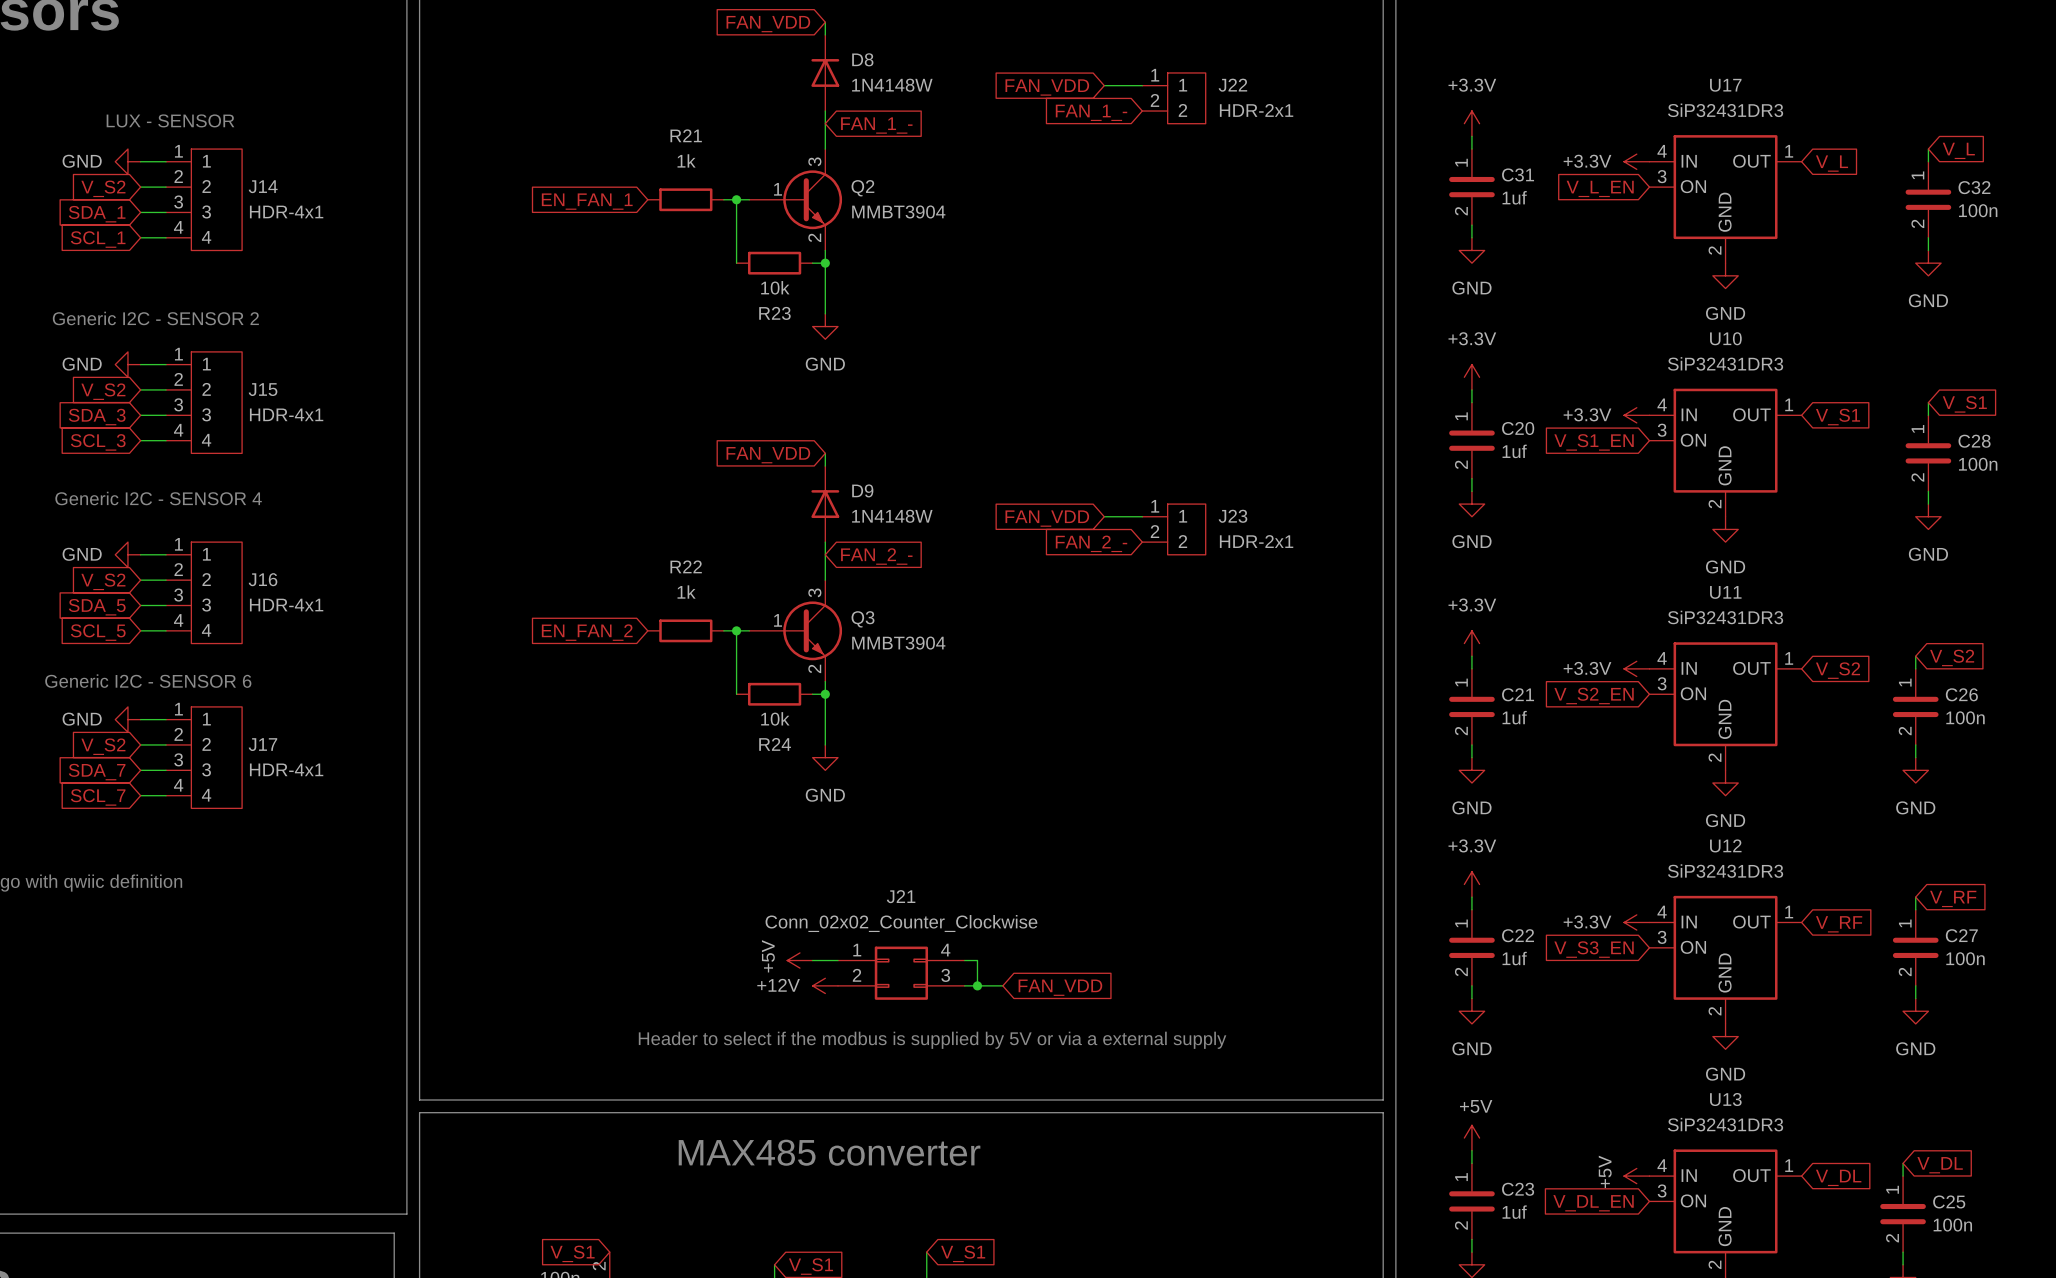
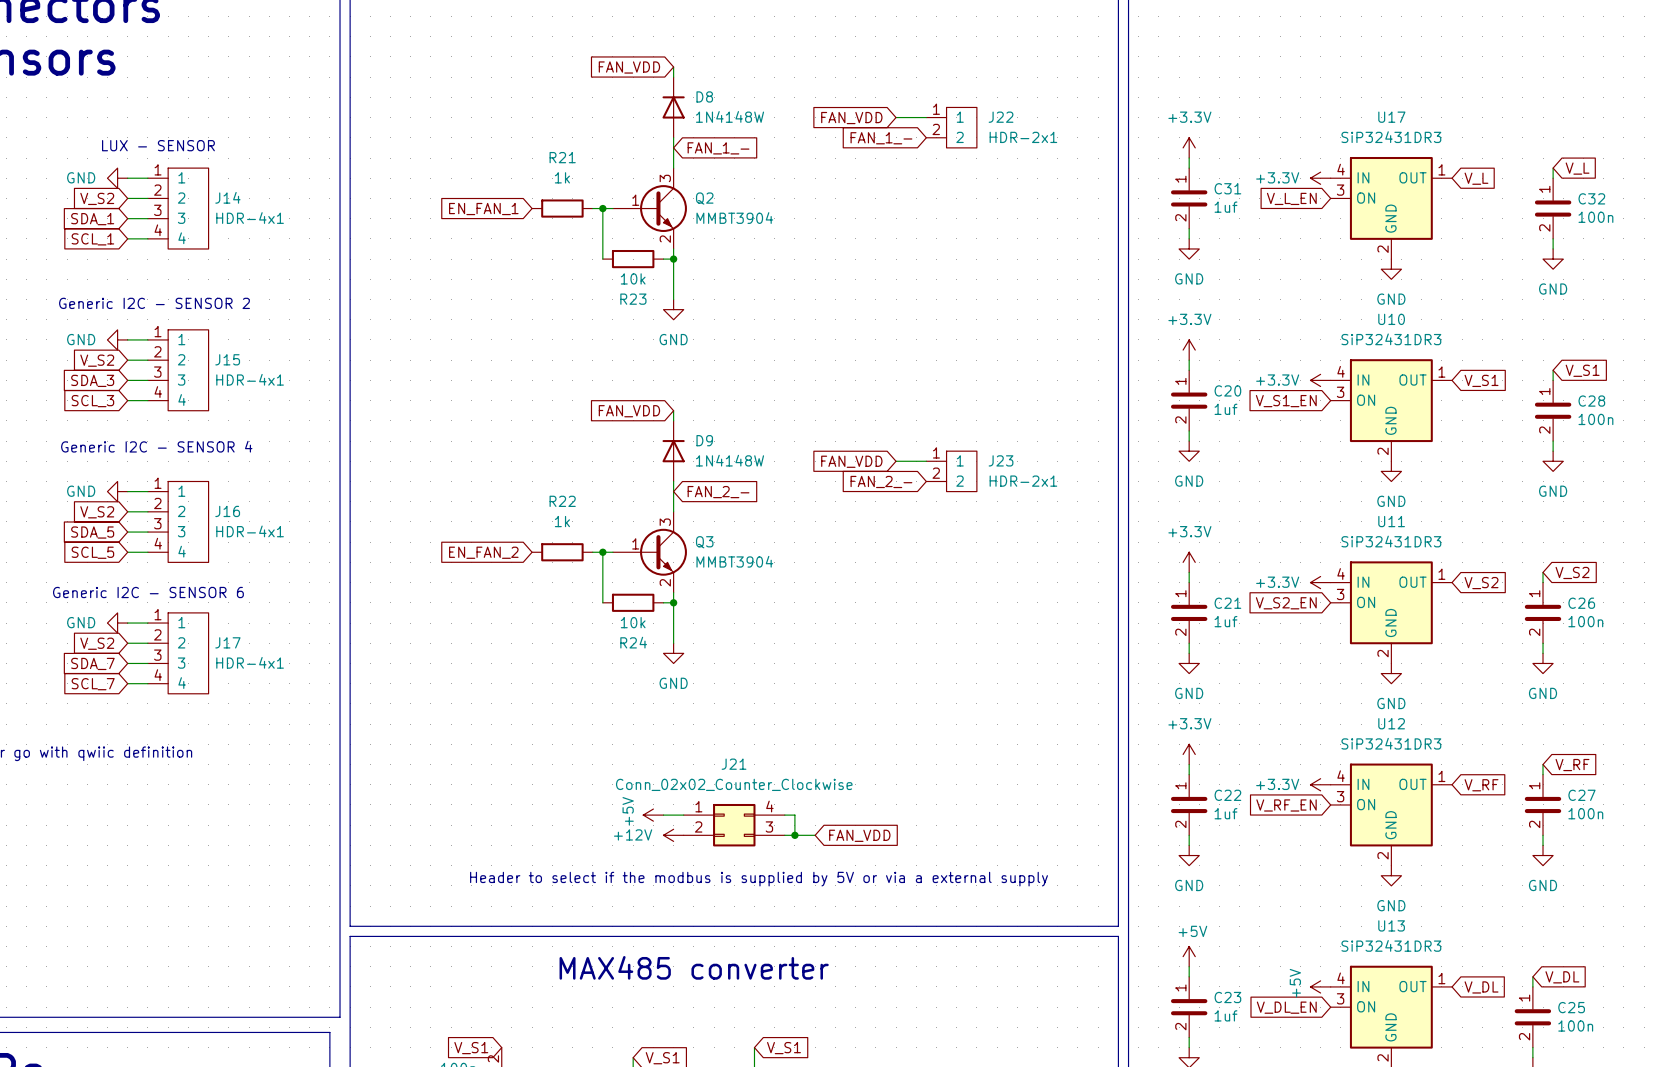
global label: V_S3_EN (1594, 949) -> V_RF_EN (1286, 805)

